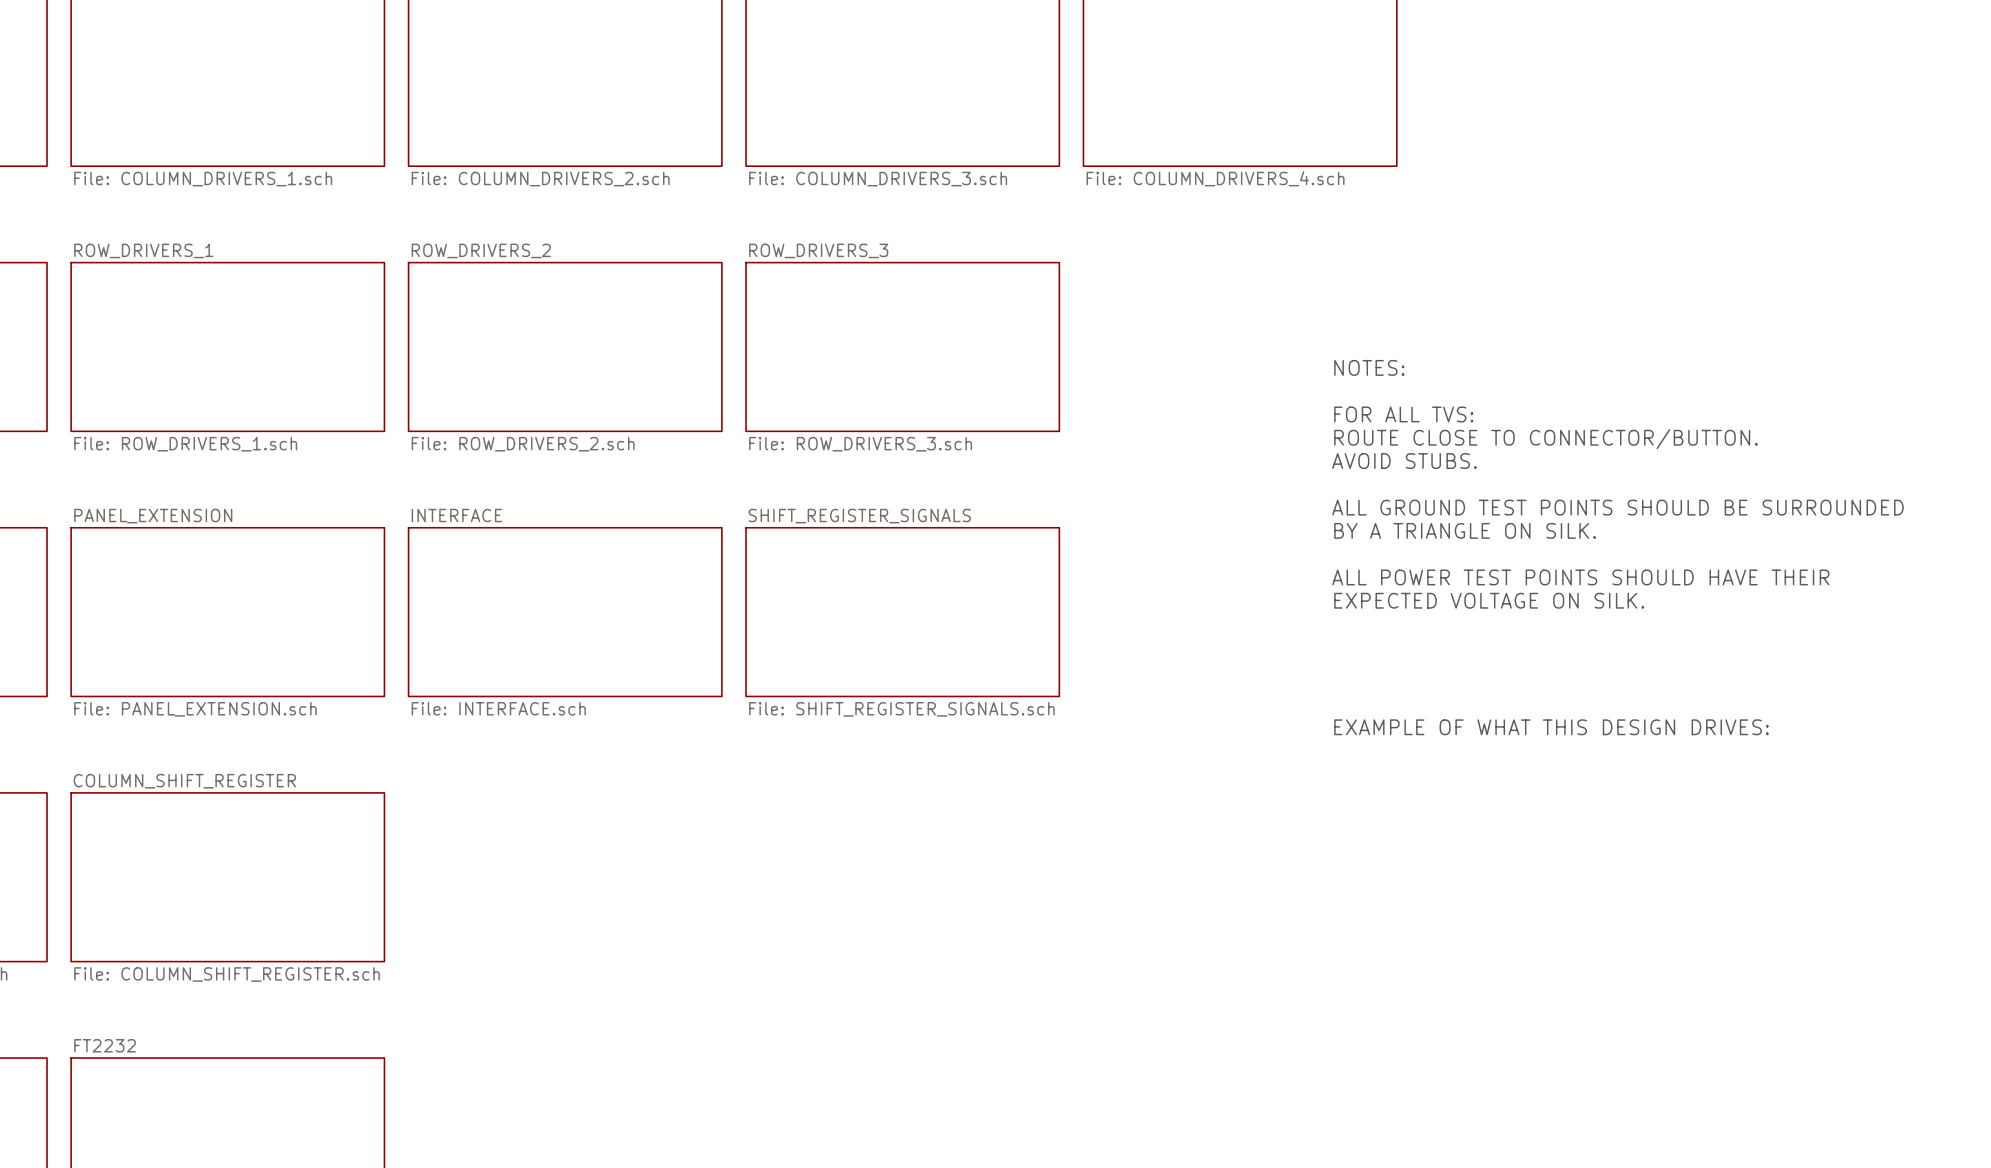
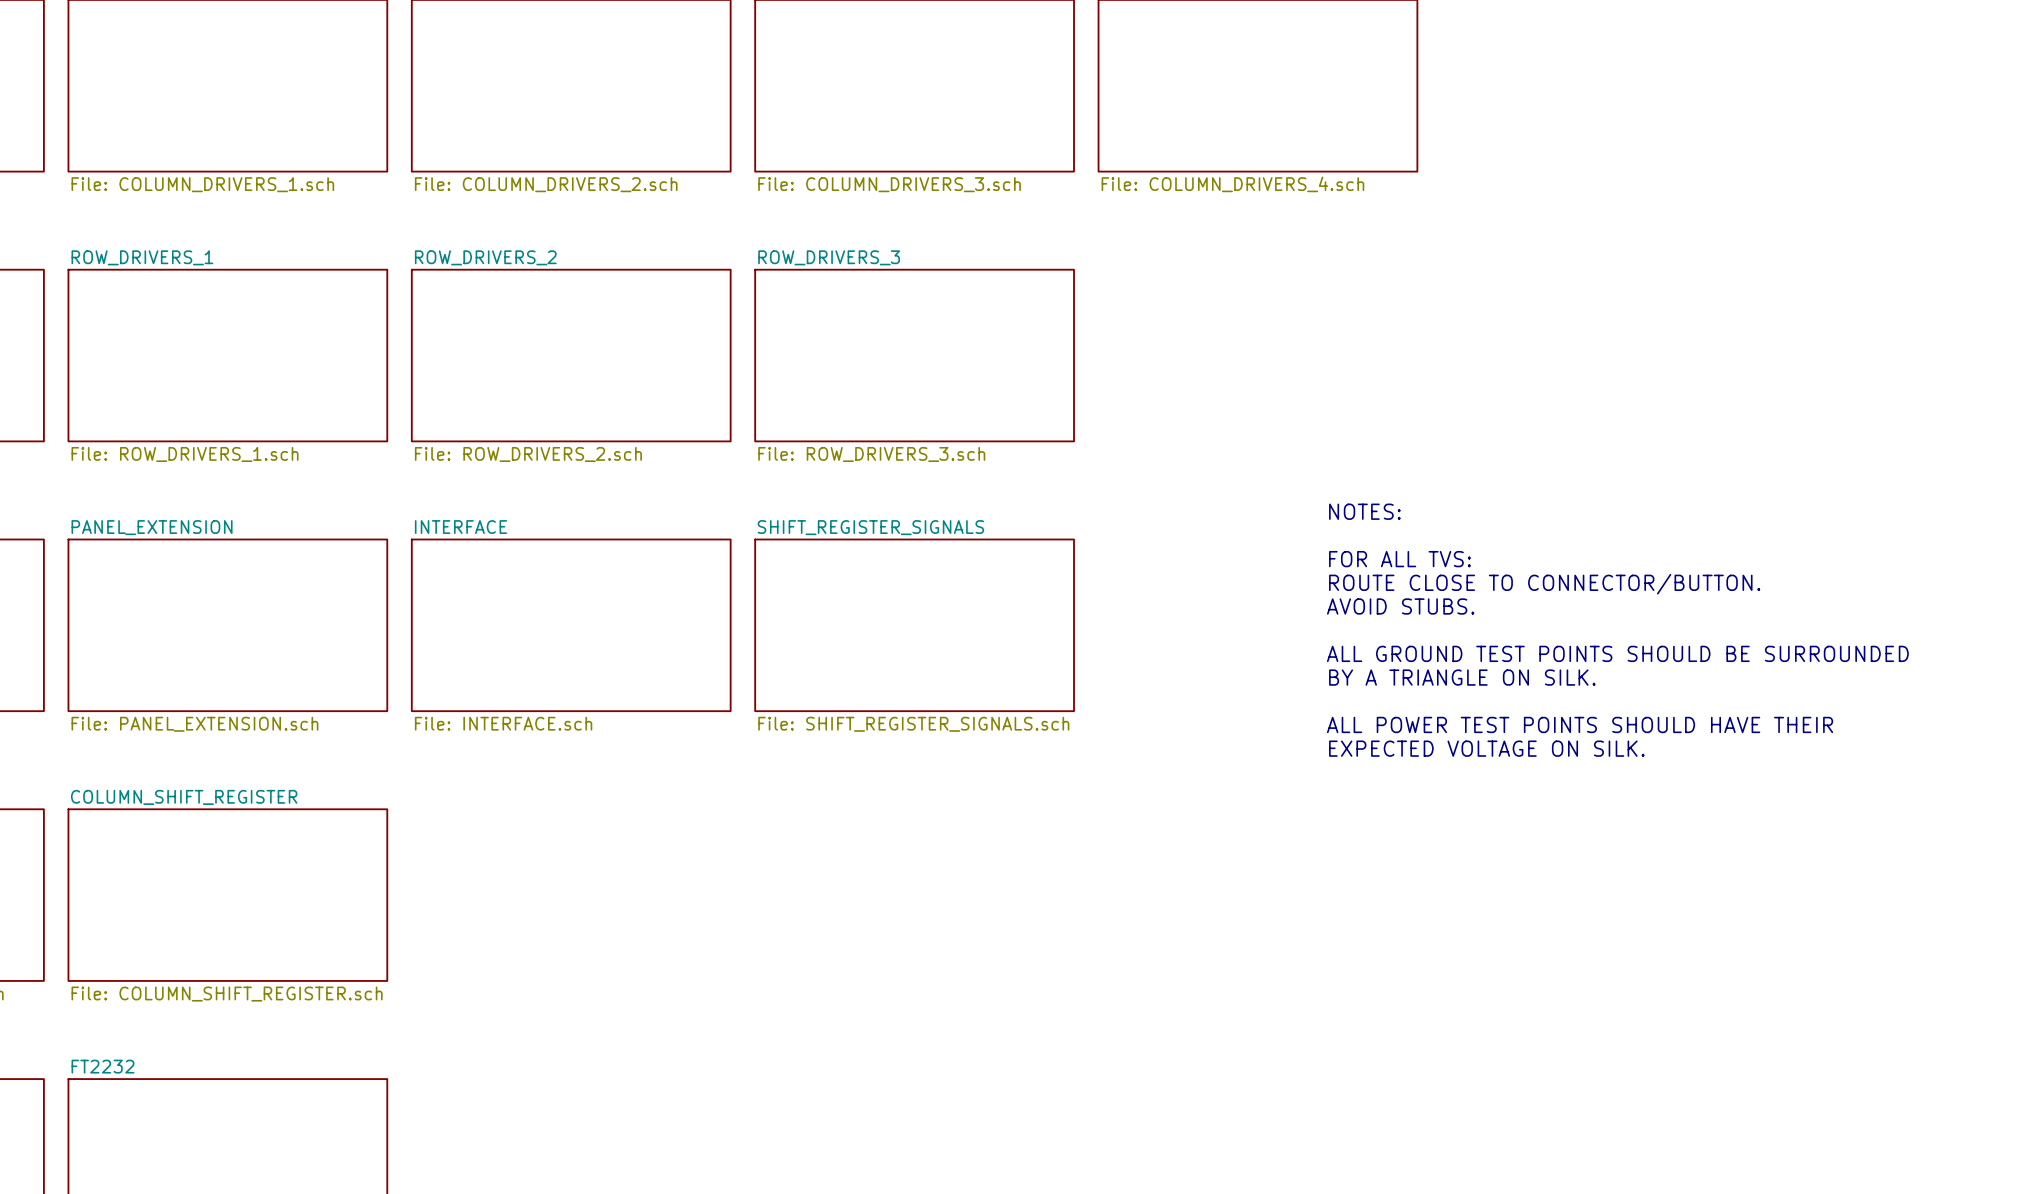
text position: NOTES: (1369, 367) -> NOTES: (1364, 511)
text position: FOR ALL TVS: (1403, 414) -> FOR ALL TVS: (1399, 559)
text position: ROUTE CLOSE TO CONNECTOR/BUTTON. (1545, 439) -> ROUTE CLOSE TO CONNECTOR/BUTTON. (1544, 584)
text position: AVOID STUBS. (1404, 461) -> AVOID STUBS. (1400, 606)
text position: ALL GROUND TEST POINTS SHOULD BE SURROUNDED (1617, 507) -> ALL GROUND TEST POINTS SHOULD BE SURROUNDED (1617, 653)
text position: BY A TRIANGLE ON SILK. (1465, 530) -> BY A TRIANGLE ON SILK. (1462, 677)
text position: ALL POWER TEST POINTS SHOULD HAVE THEIR (1580, 577) -> ALL POWER TEST POINTS SHOULD HAVE THEIR (1580, 724)
text position: EXPECTED VOLTAGE ON SILK. (1489, 600) -> EXPECTED VOLTAGE ON SILK. (1486, 748)
text: EXAMPLE OF WHAT THIS DESIGN DRIVES: (1551, 727) -> none

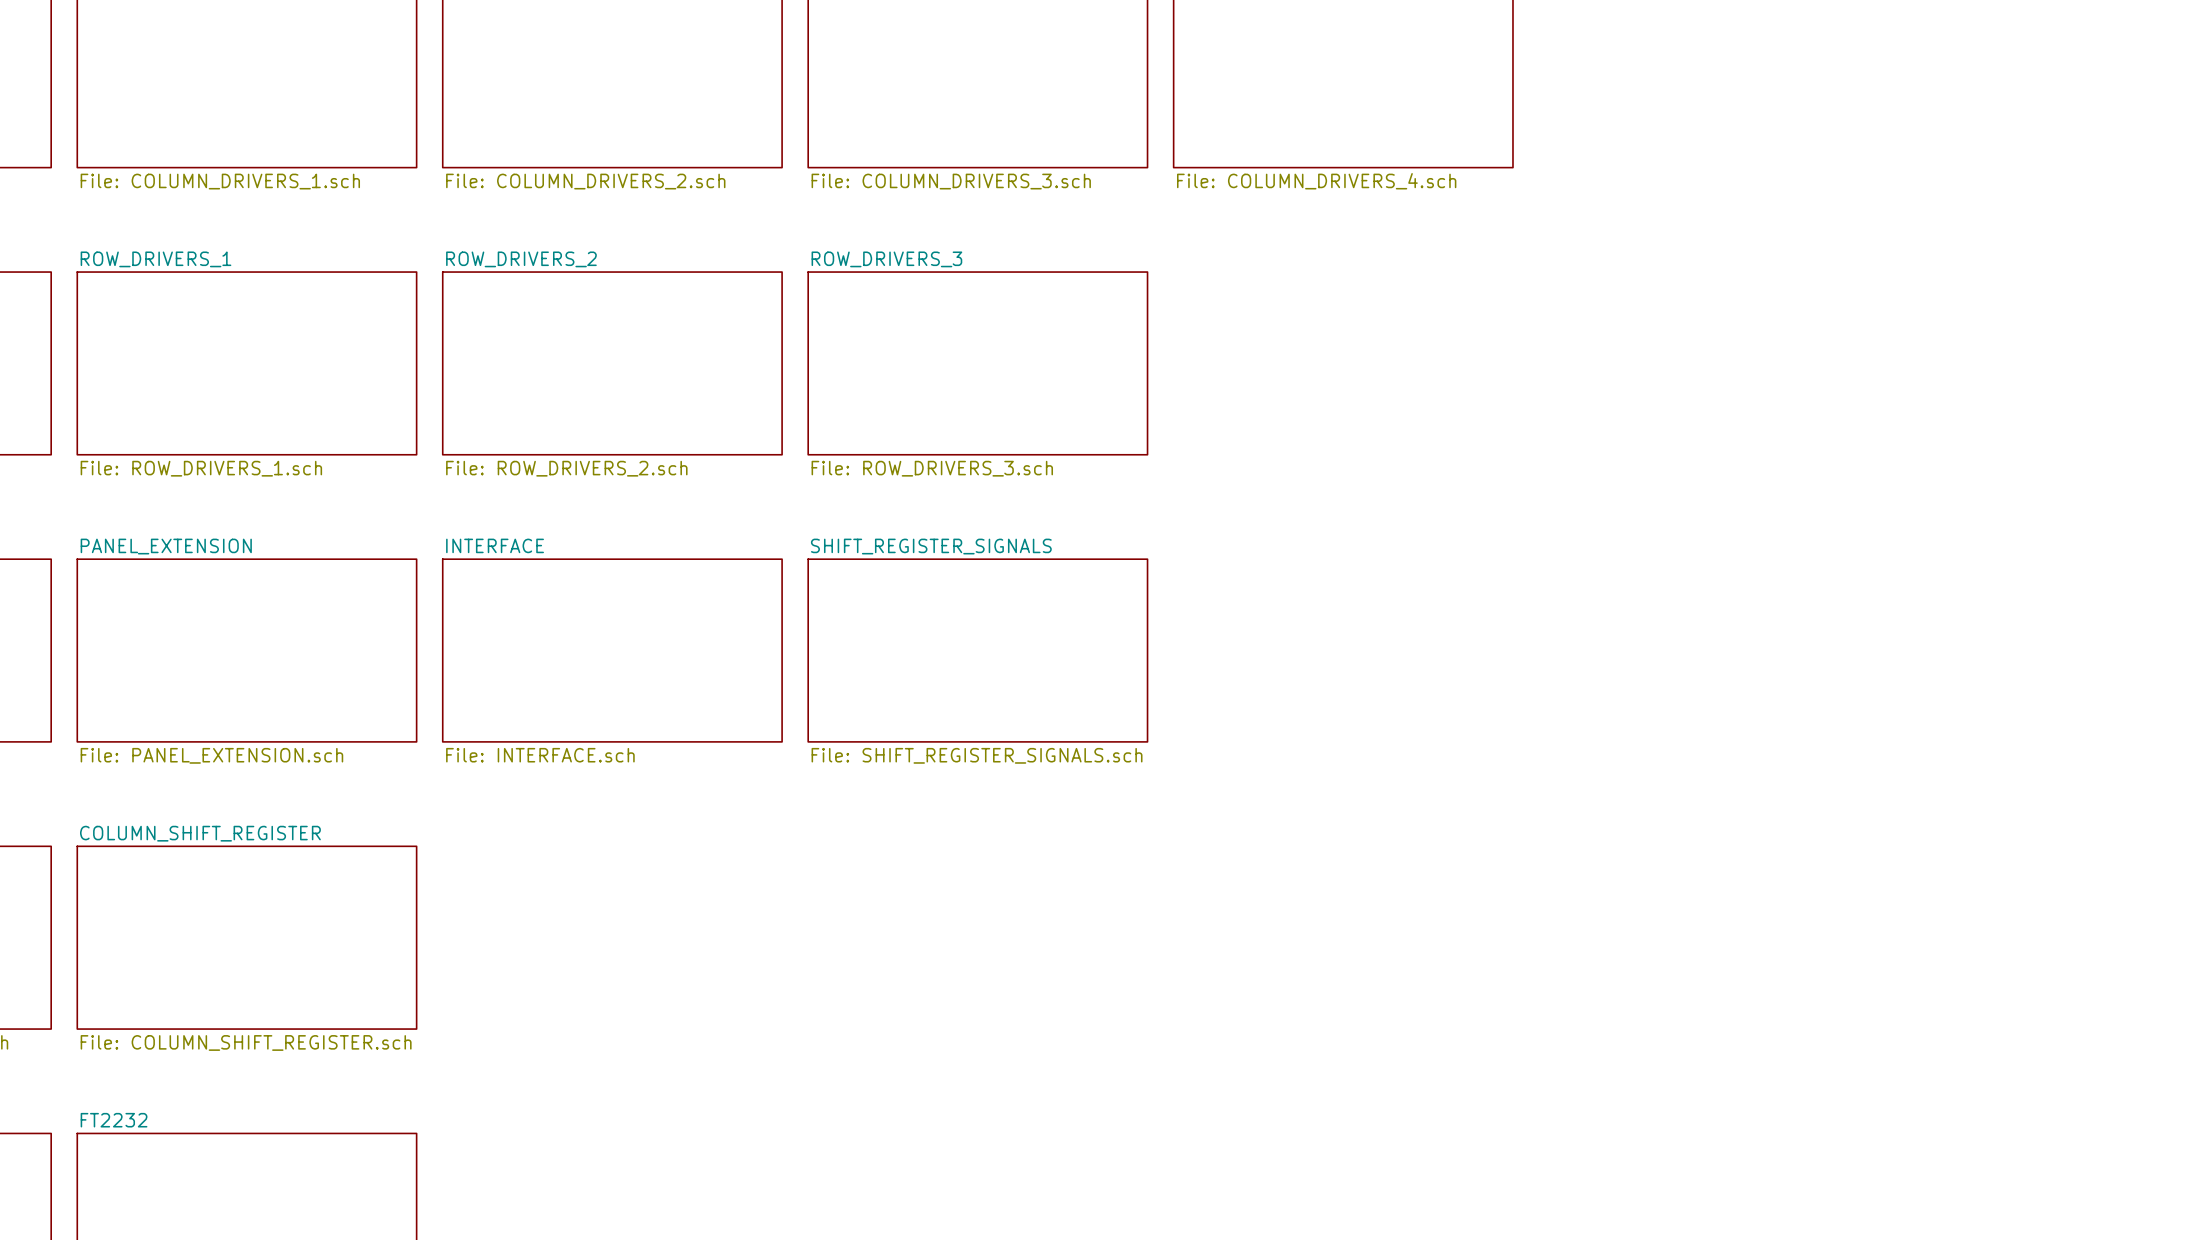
text: NOTES: (1364, 511) -> none
text: FOR ALL TVS: (1399, 559) -> none
text: ROUTE CLOSE TO CONNECTOR/BUTTON. (1544, 584) -> none
text: AVOID STUBS. (1400, 606) -> none
text: ALL GROUND TEST POINTS SHOULD BE SURROUNDED (1617, 653) -> none
text: BY A TRIANGLE ON SILK. (1462, 677) -> none
text: ALL POWER TEST POINTS SHOULD HAVE THEIR (1580, 724) -> none
text: EXPECTED VOLTAGE ON SILK. (1486, 748) -> none

